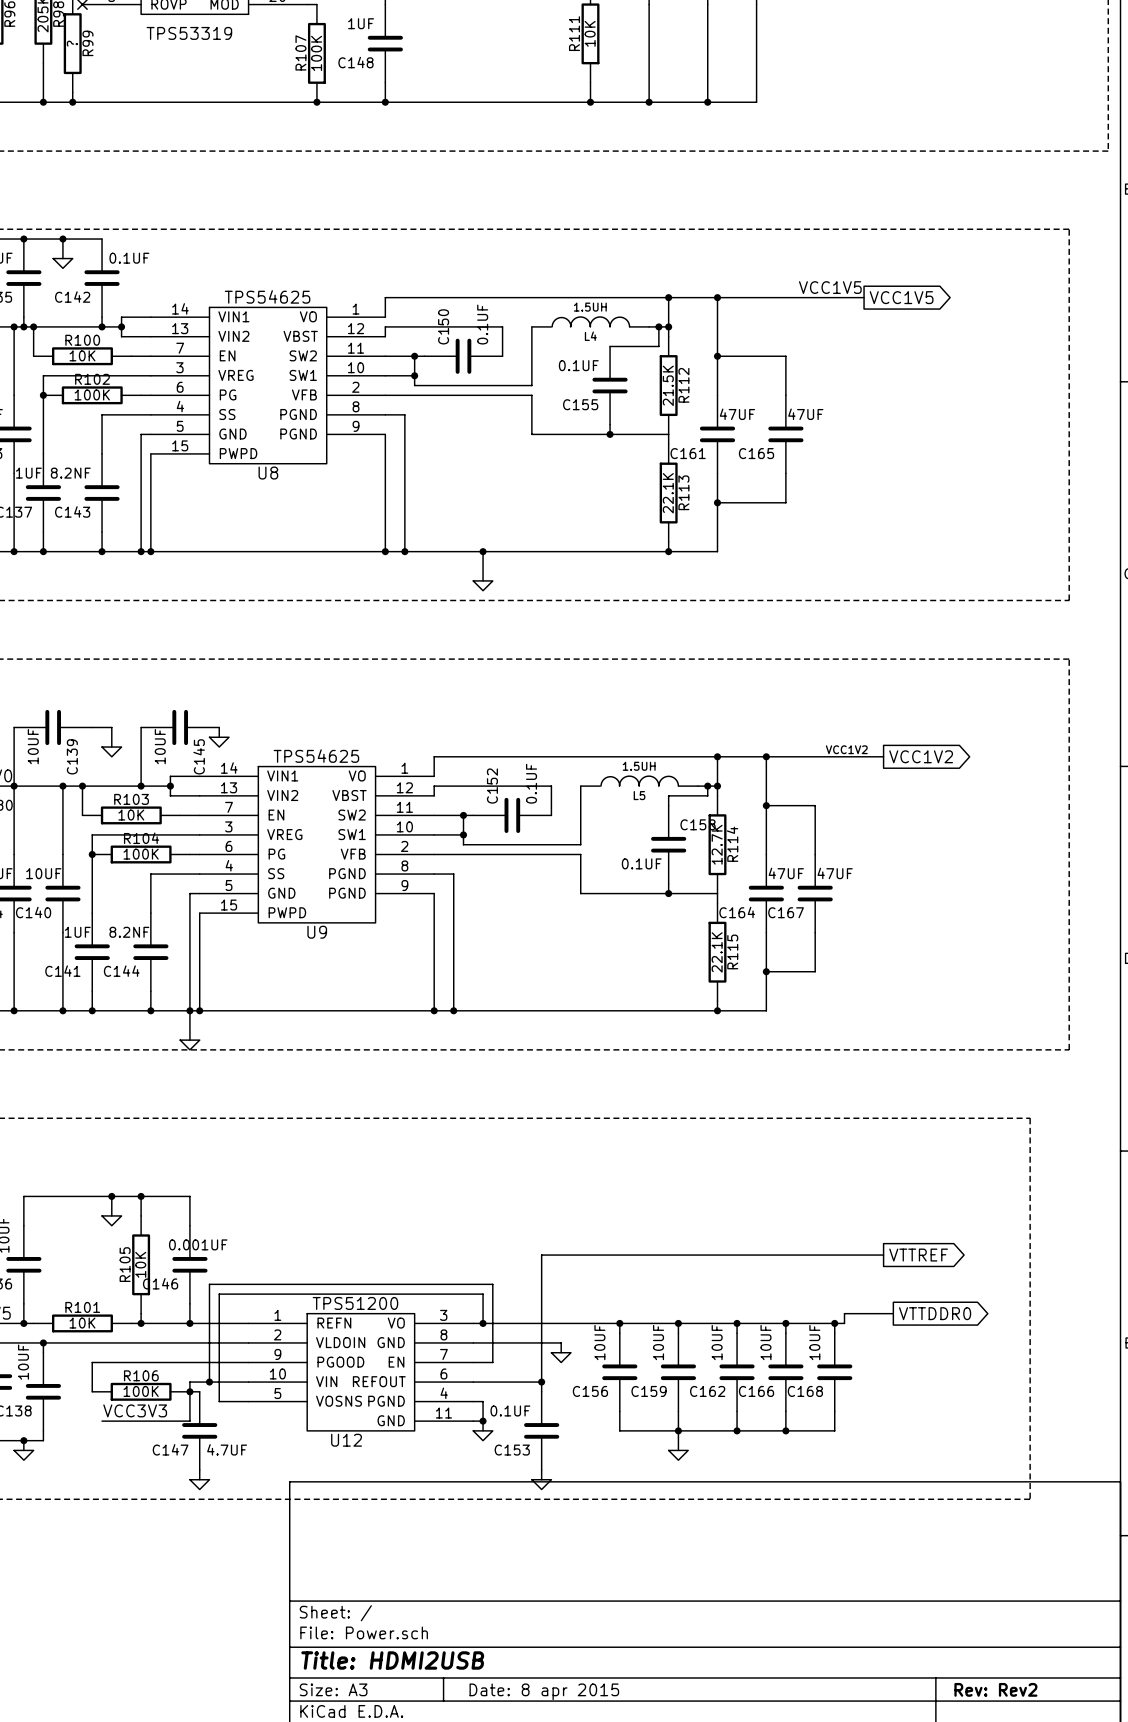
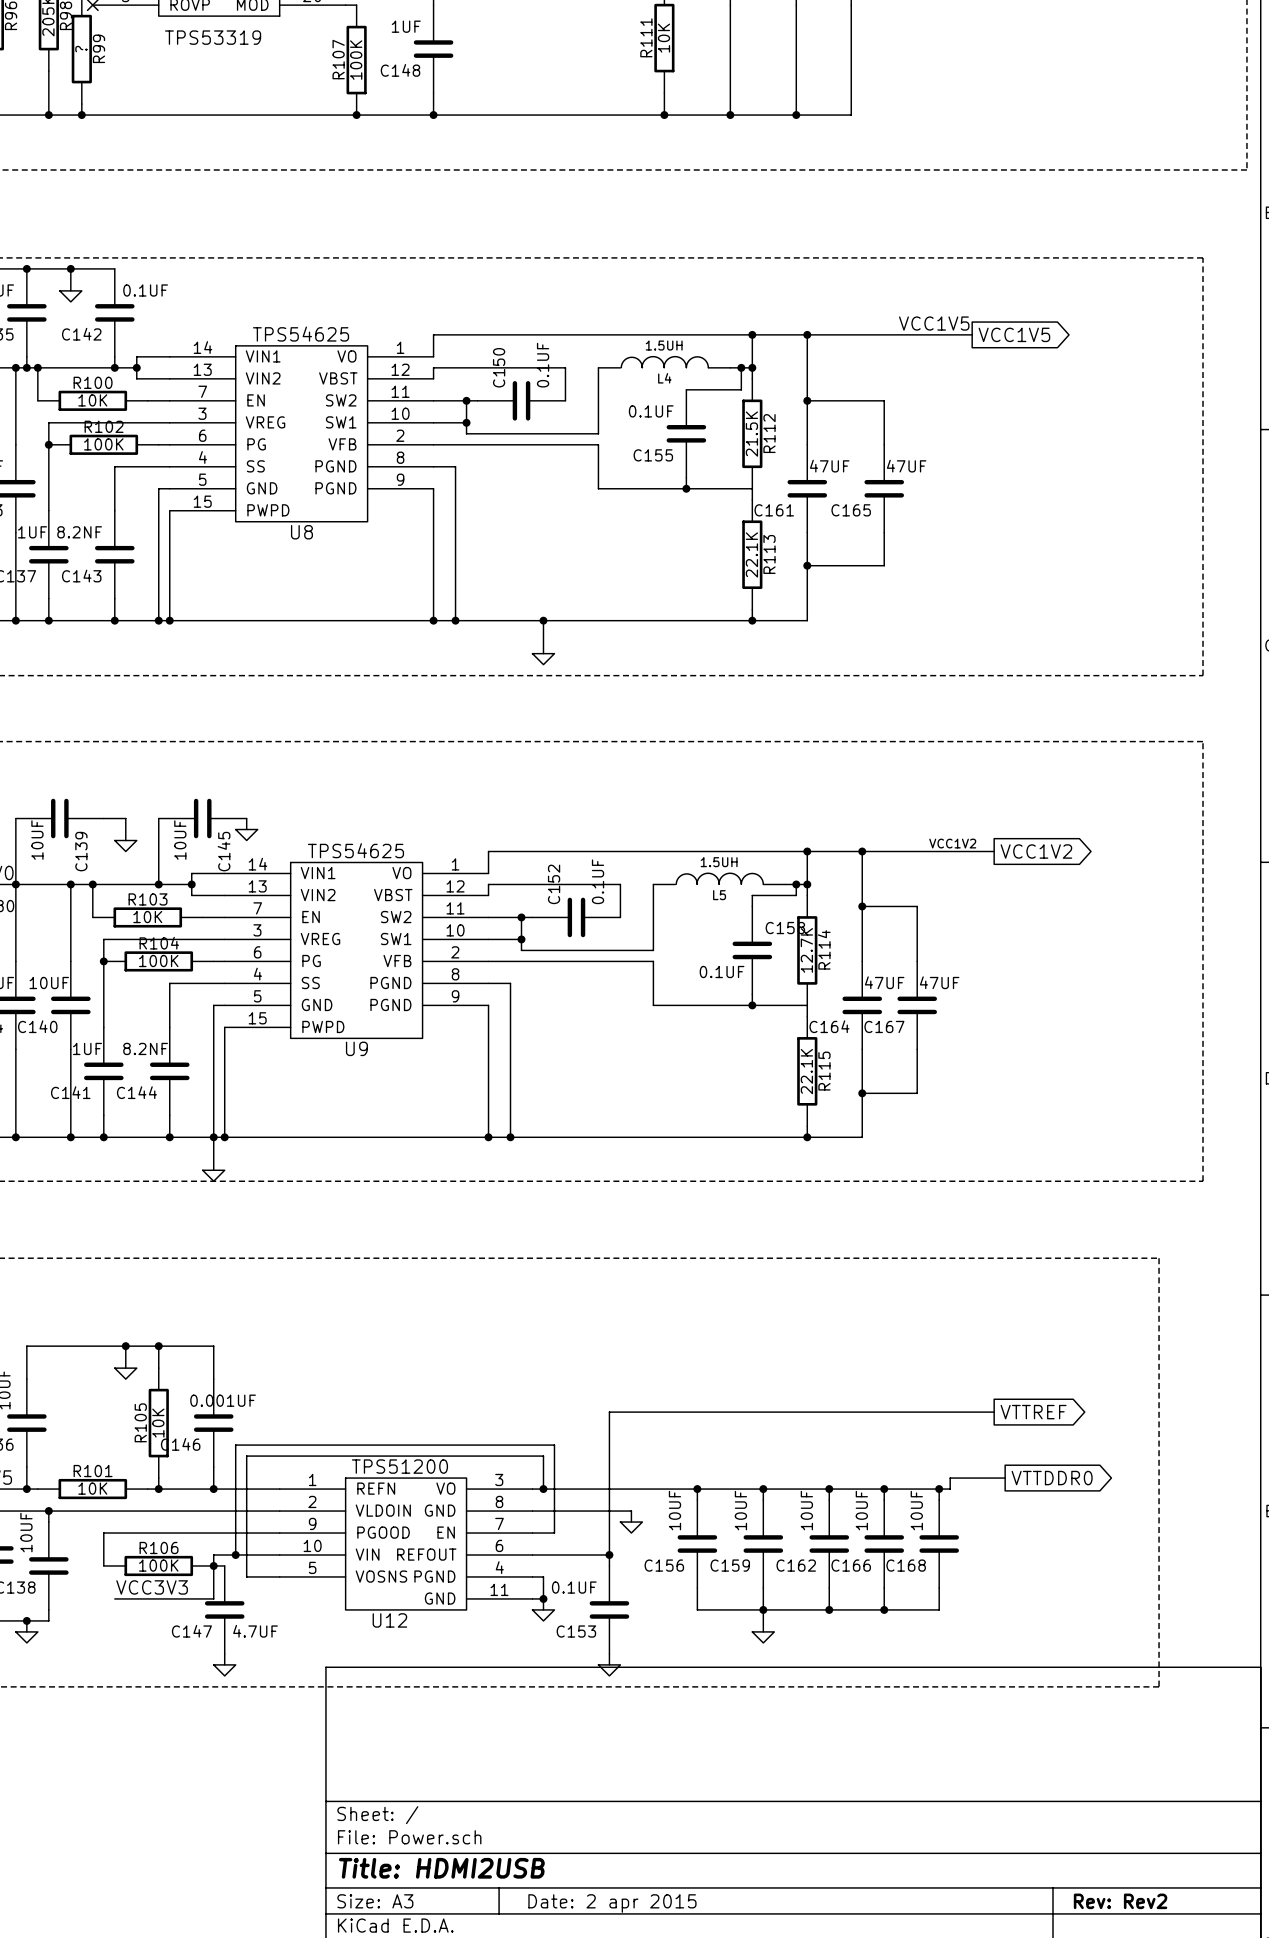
title block: Date: 8 apr 2015 (544, 1691) -> Date: 2 apr 2015 (612, 1903)

